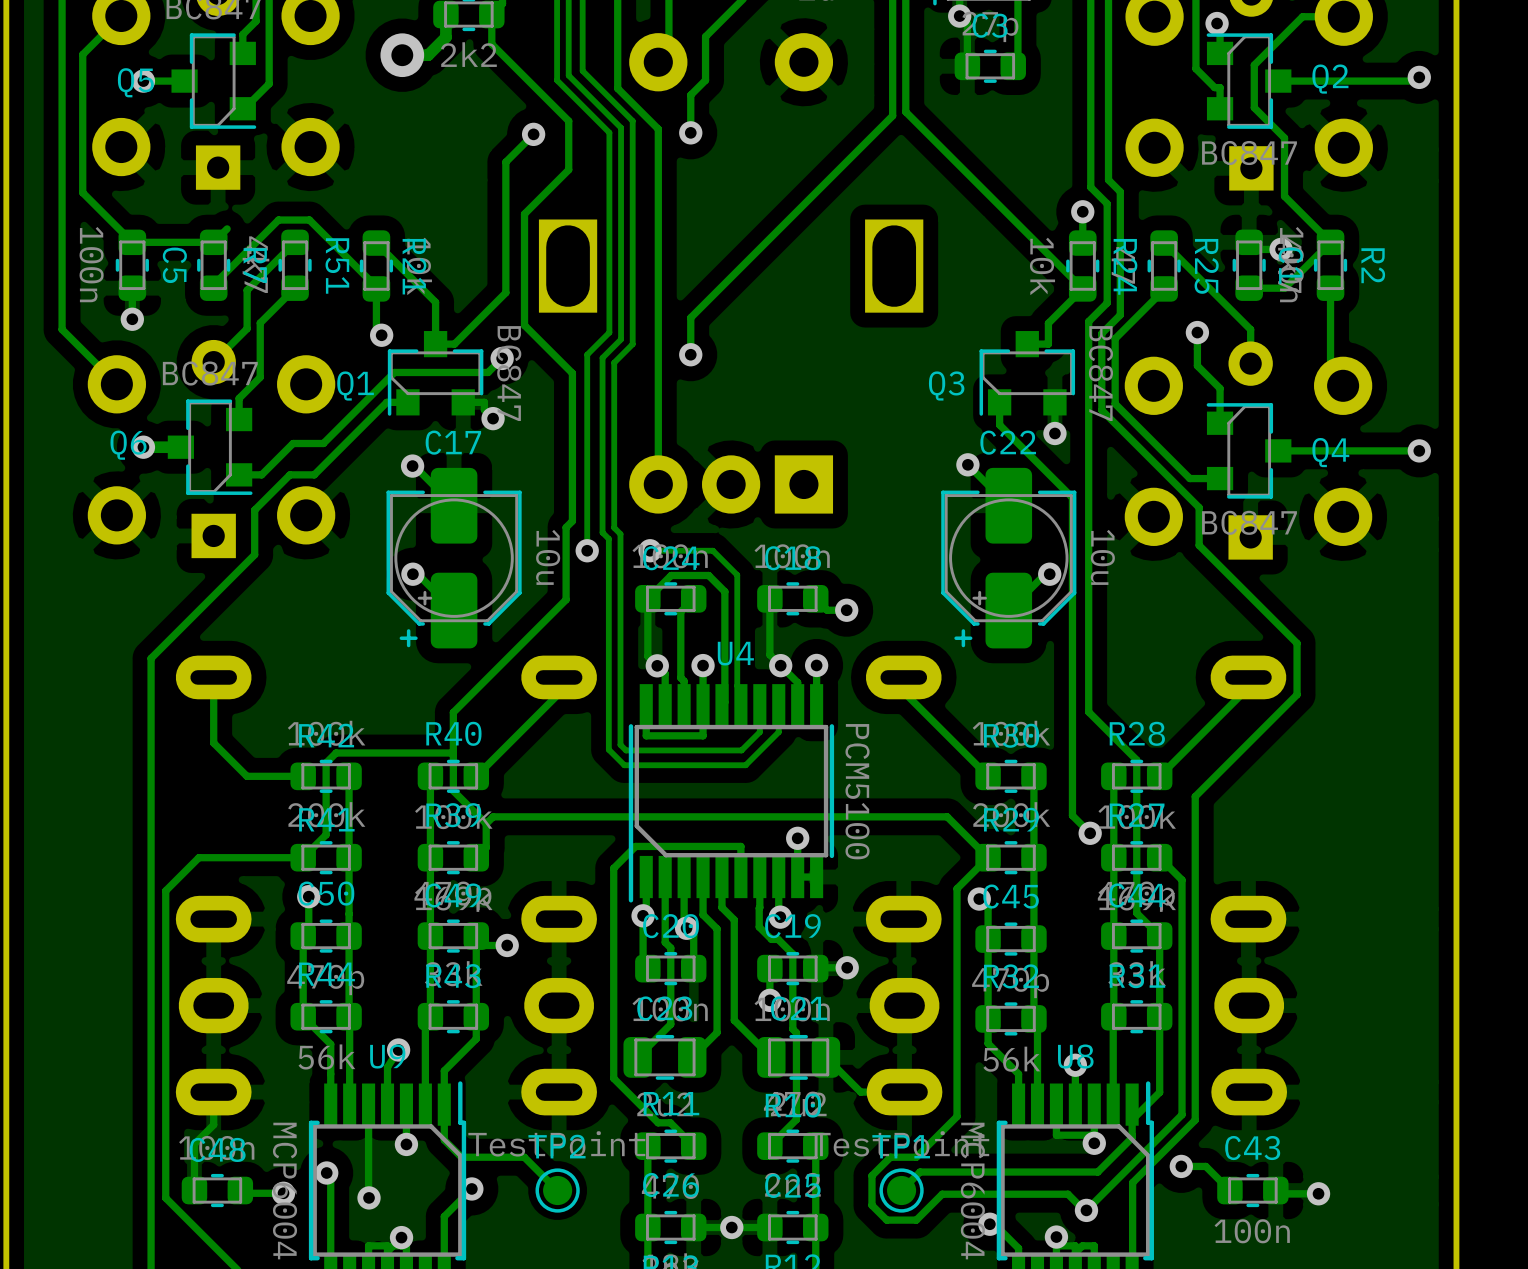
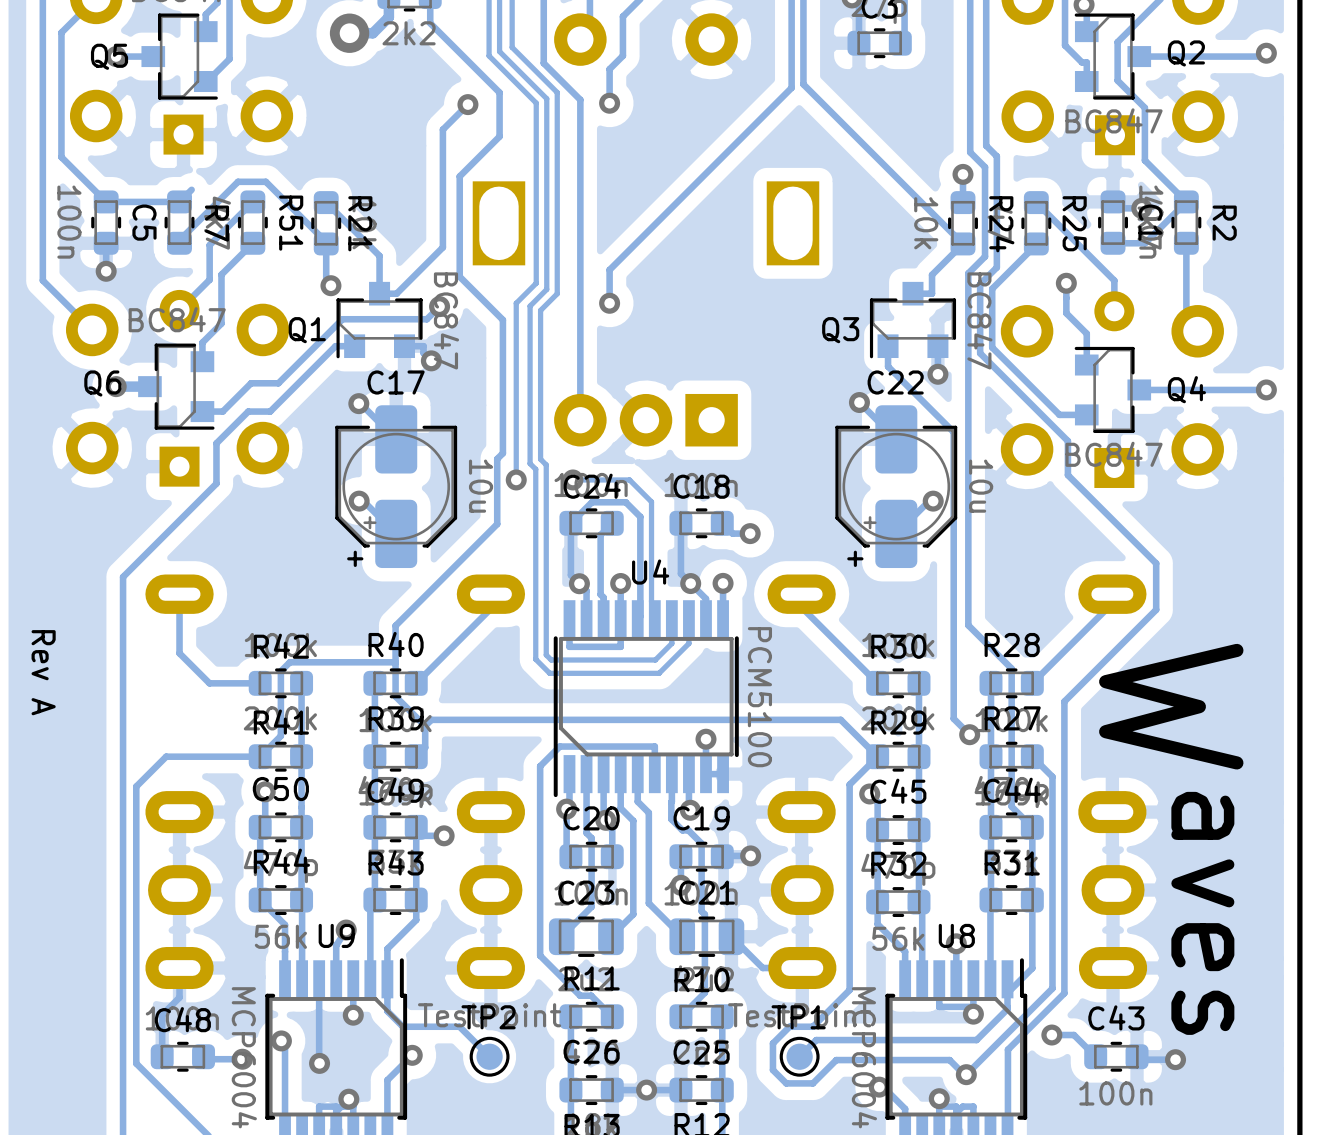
text: none -> Rev A (43, 672)
text: none -> W (1171, 706)
text: none -> aves (1202, 913)

